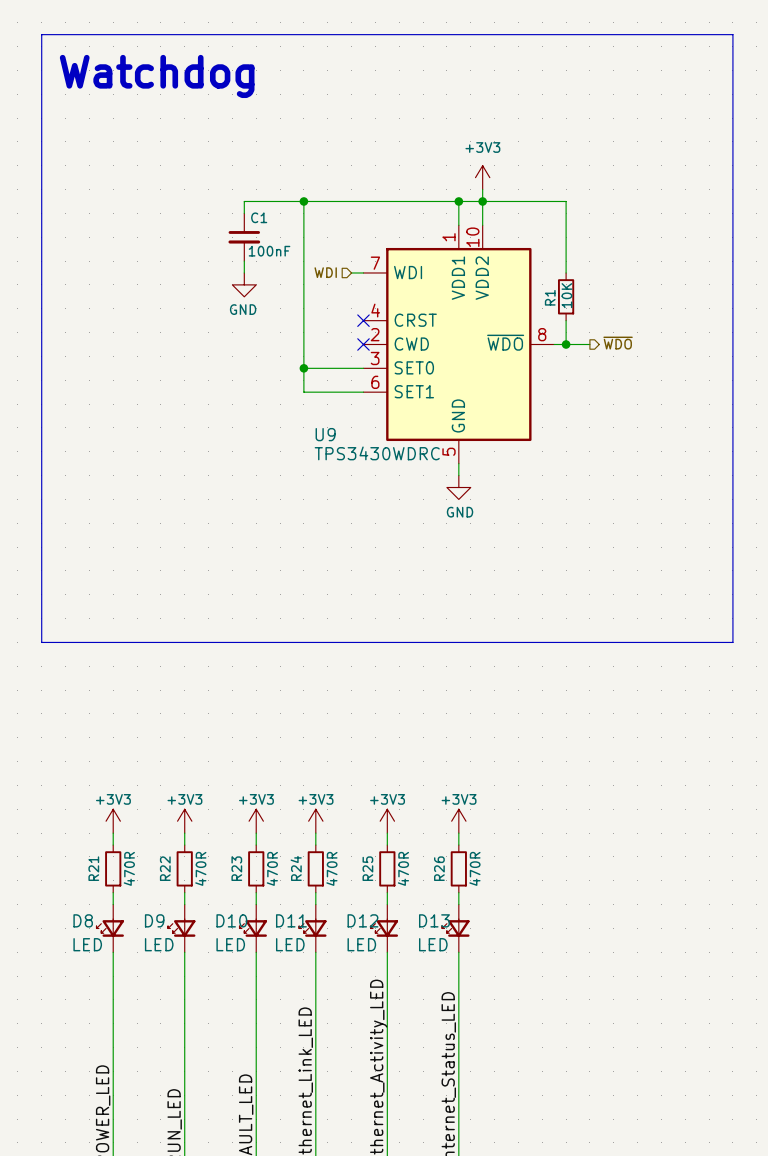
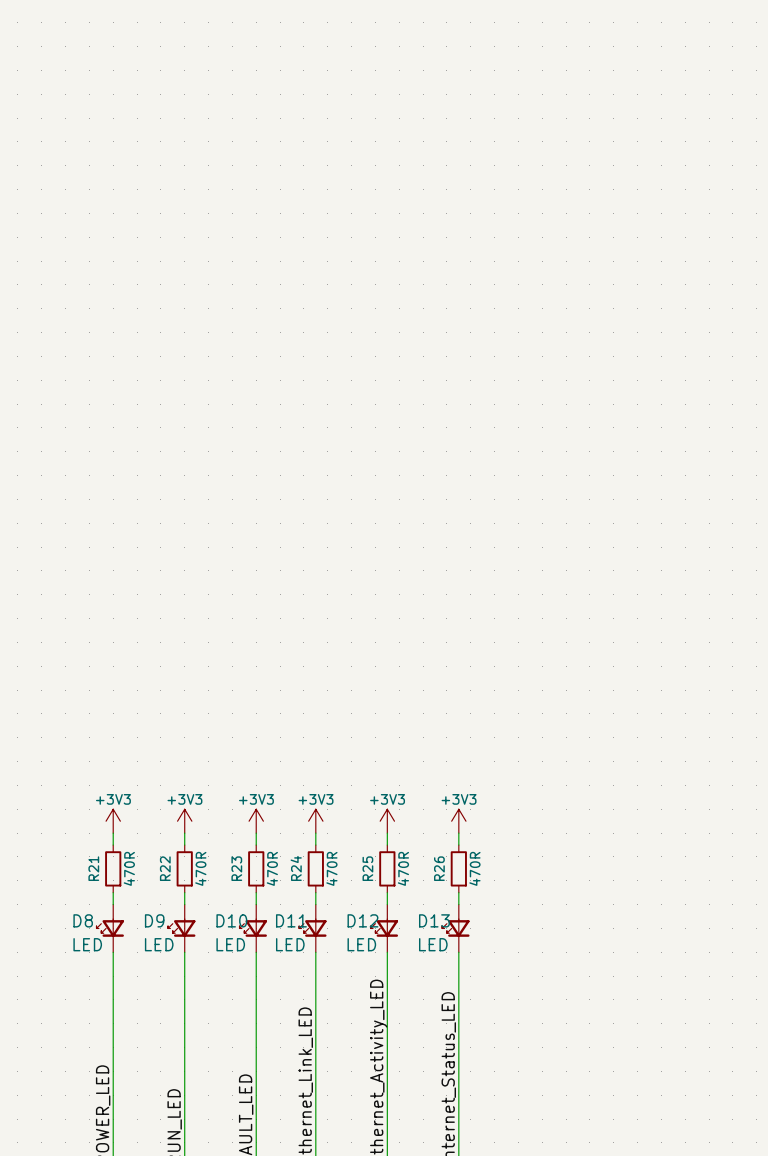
line: (41, 34) (732, 34) (732, 642) (41, 642) (41, 34) -> none
text: Watchdog (157, 76) -> none
power symbol: +3V3 (482, 177) -> none
wire: (482, 189) (482, 225) -> none
wire: (303, 201) (303, 392) (363, 392) -> none
junction: (303, 201) -> none
wire: (458, 201) (458, 225) -> none
junction: (458, 201) -> none
junction: (482, 201) -> none
wire: (244, 213) (244, 201) (566, 201) (566, 272) -> none
C1: 100nF (244, 237) -> none
wire: (244, 261) (244, 272) -> none
hierarchical label: WDI (325, 272) -> none
wire: (351, 272) (363, 272) -> none
power symbol: GND (244, 284) -> none
R1: 10K (566, 296) -> none
no-connect mark: (363, 320) -> none
wire: (566, 320) (566, 344) -> none
hierarchical label: ~{WDO} (618, 343) -> none
no-connect mark: (363, 344) -> none
U9: TPS3430WDRC (458, 344) -> none
wire: (554, 344) (589, 344) -> none
junction: (566, 344) -> none
wire: (303, 368) (363, 368) -> none
junction: (303, 368) -> none
wire: (458, 463) (458, 475) -> none
power symbol: GND (458, 487) -> none

